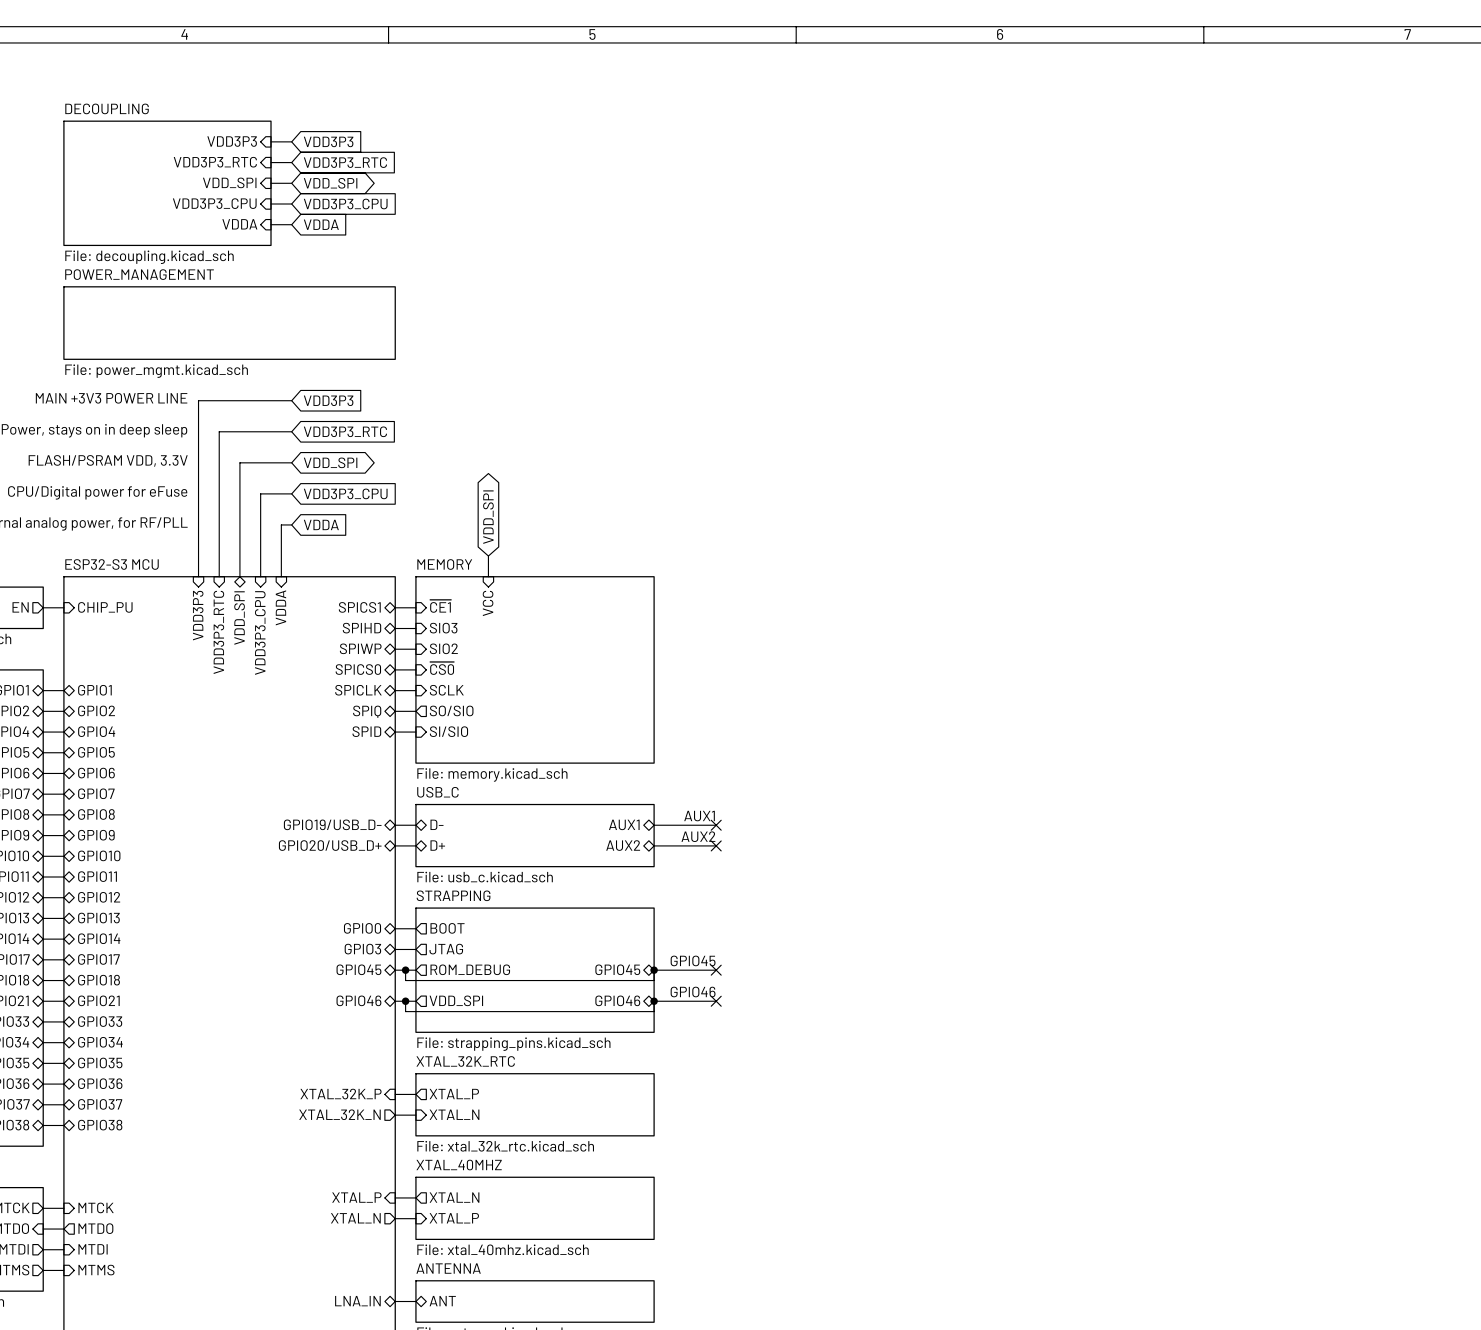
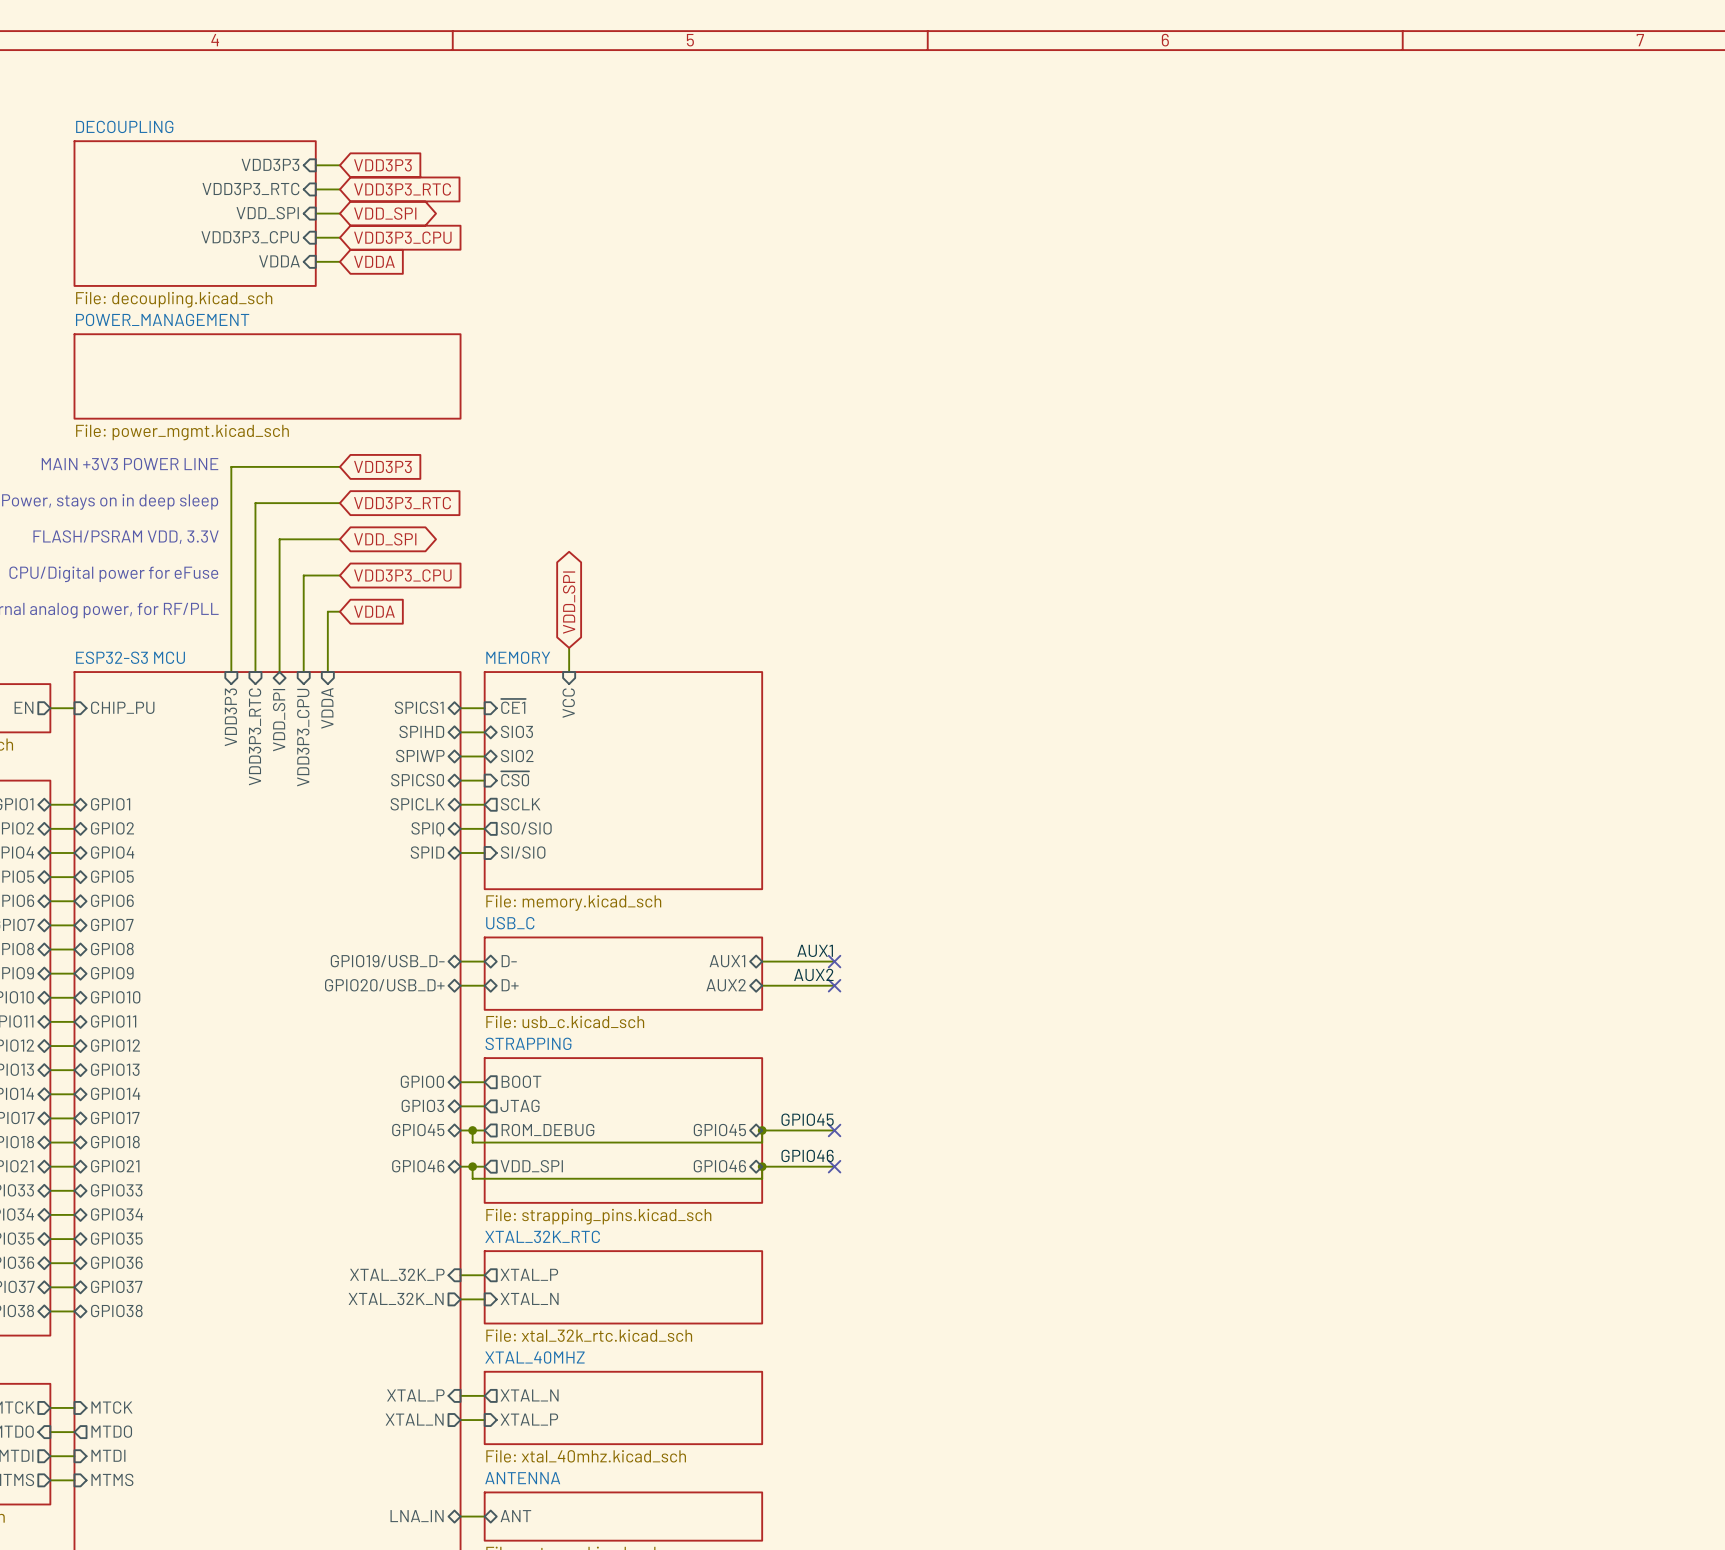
sheet pin shape: input (443, 628) -> bidirectional (516, 731)
sheet pin shape: input (443, 648) -> bidirectional (517, 756)
sheet pin shape: input (446, 690) -> output (520, 804)

